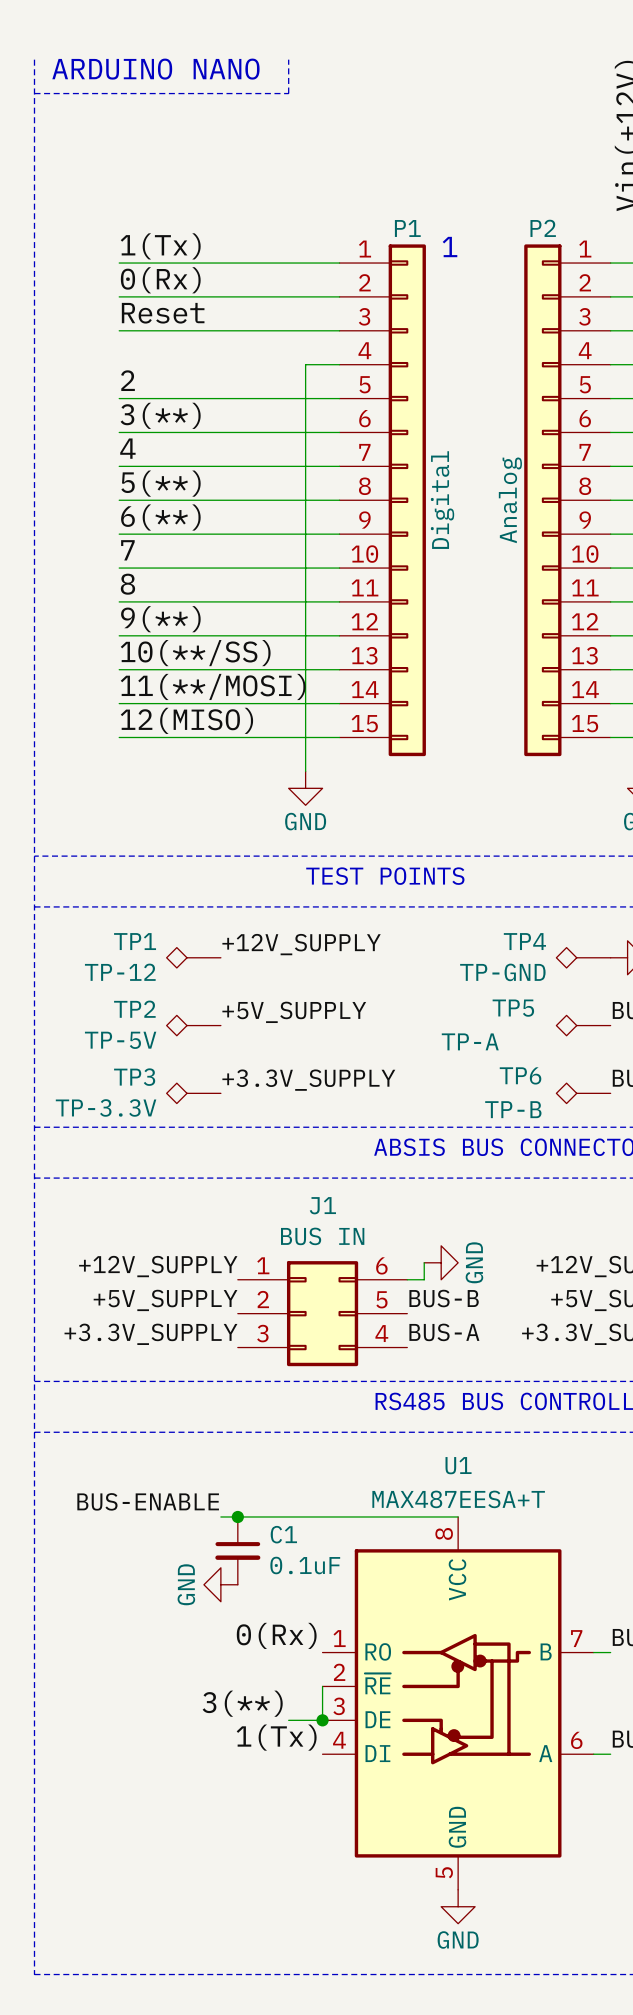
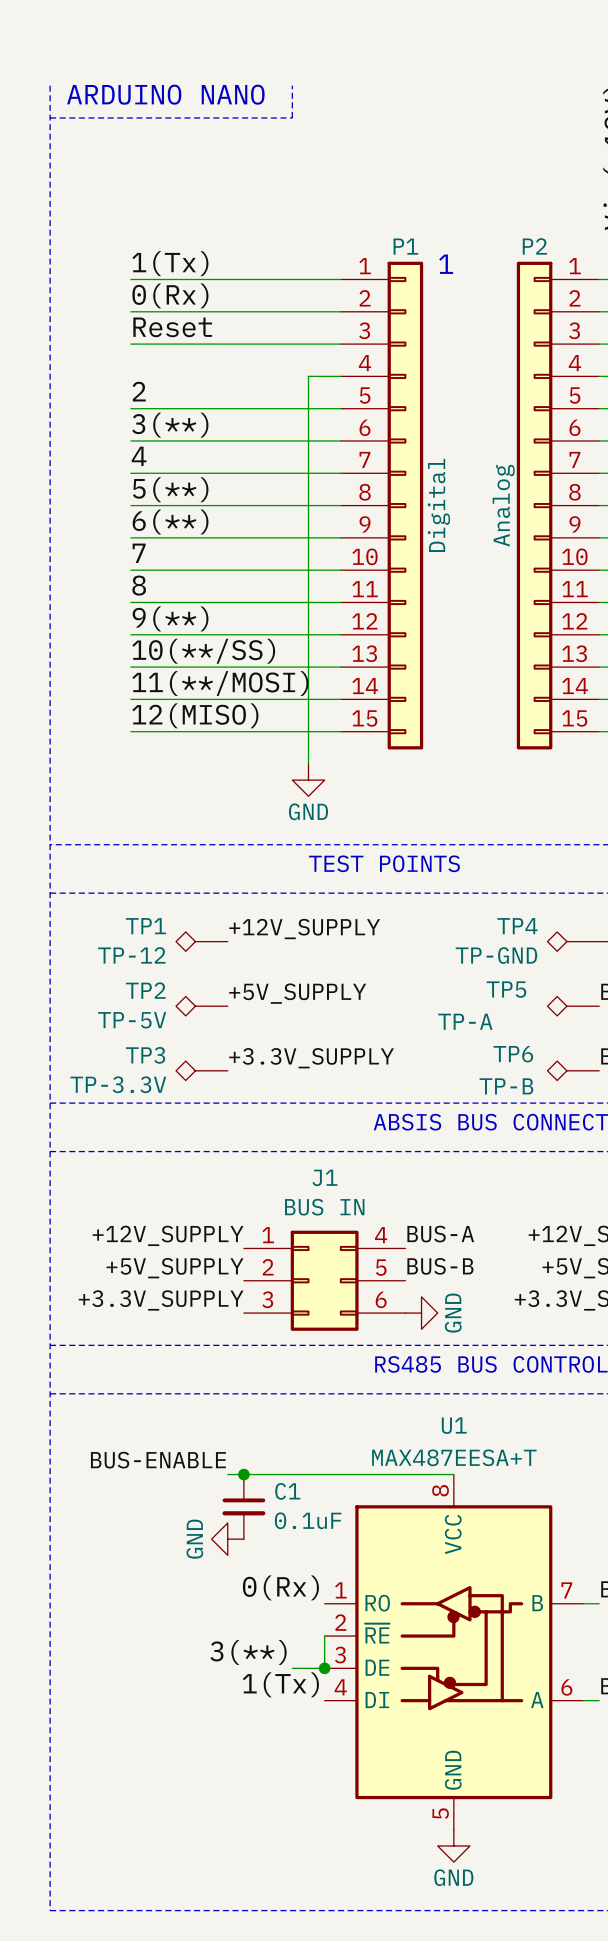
wire: (424, 1262) (424, 1279) (407, 1279) -> none
power symbol position: GND (441, 1262) -> GND (421, 1313)
J1 pin number: 6 (381, 1265) -> 4 (381, 1235)
label position: BUS-A (444, 1332) -> BUS-A (440, 1234)
J1 pin number: 4 (381, 1333) -> 6 (381, 1299)

